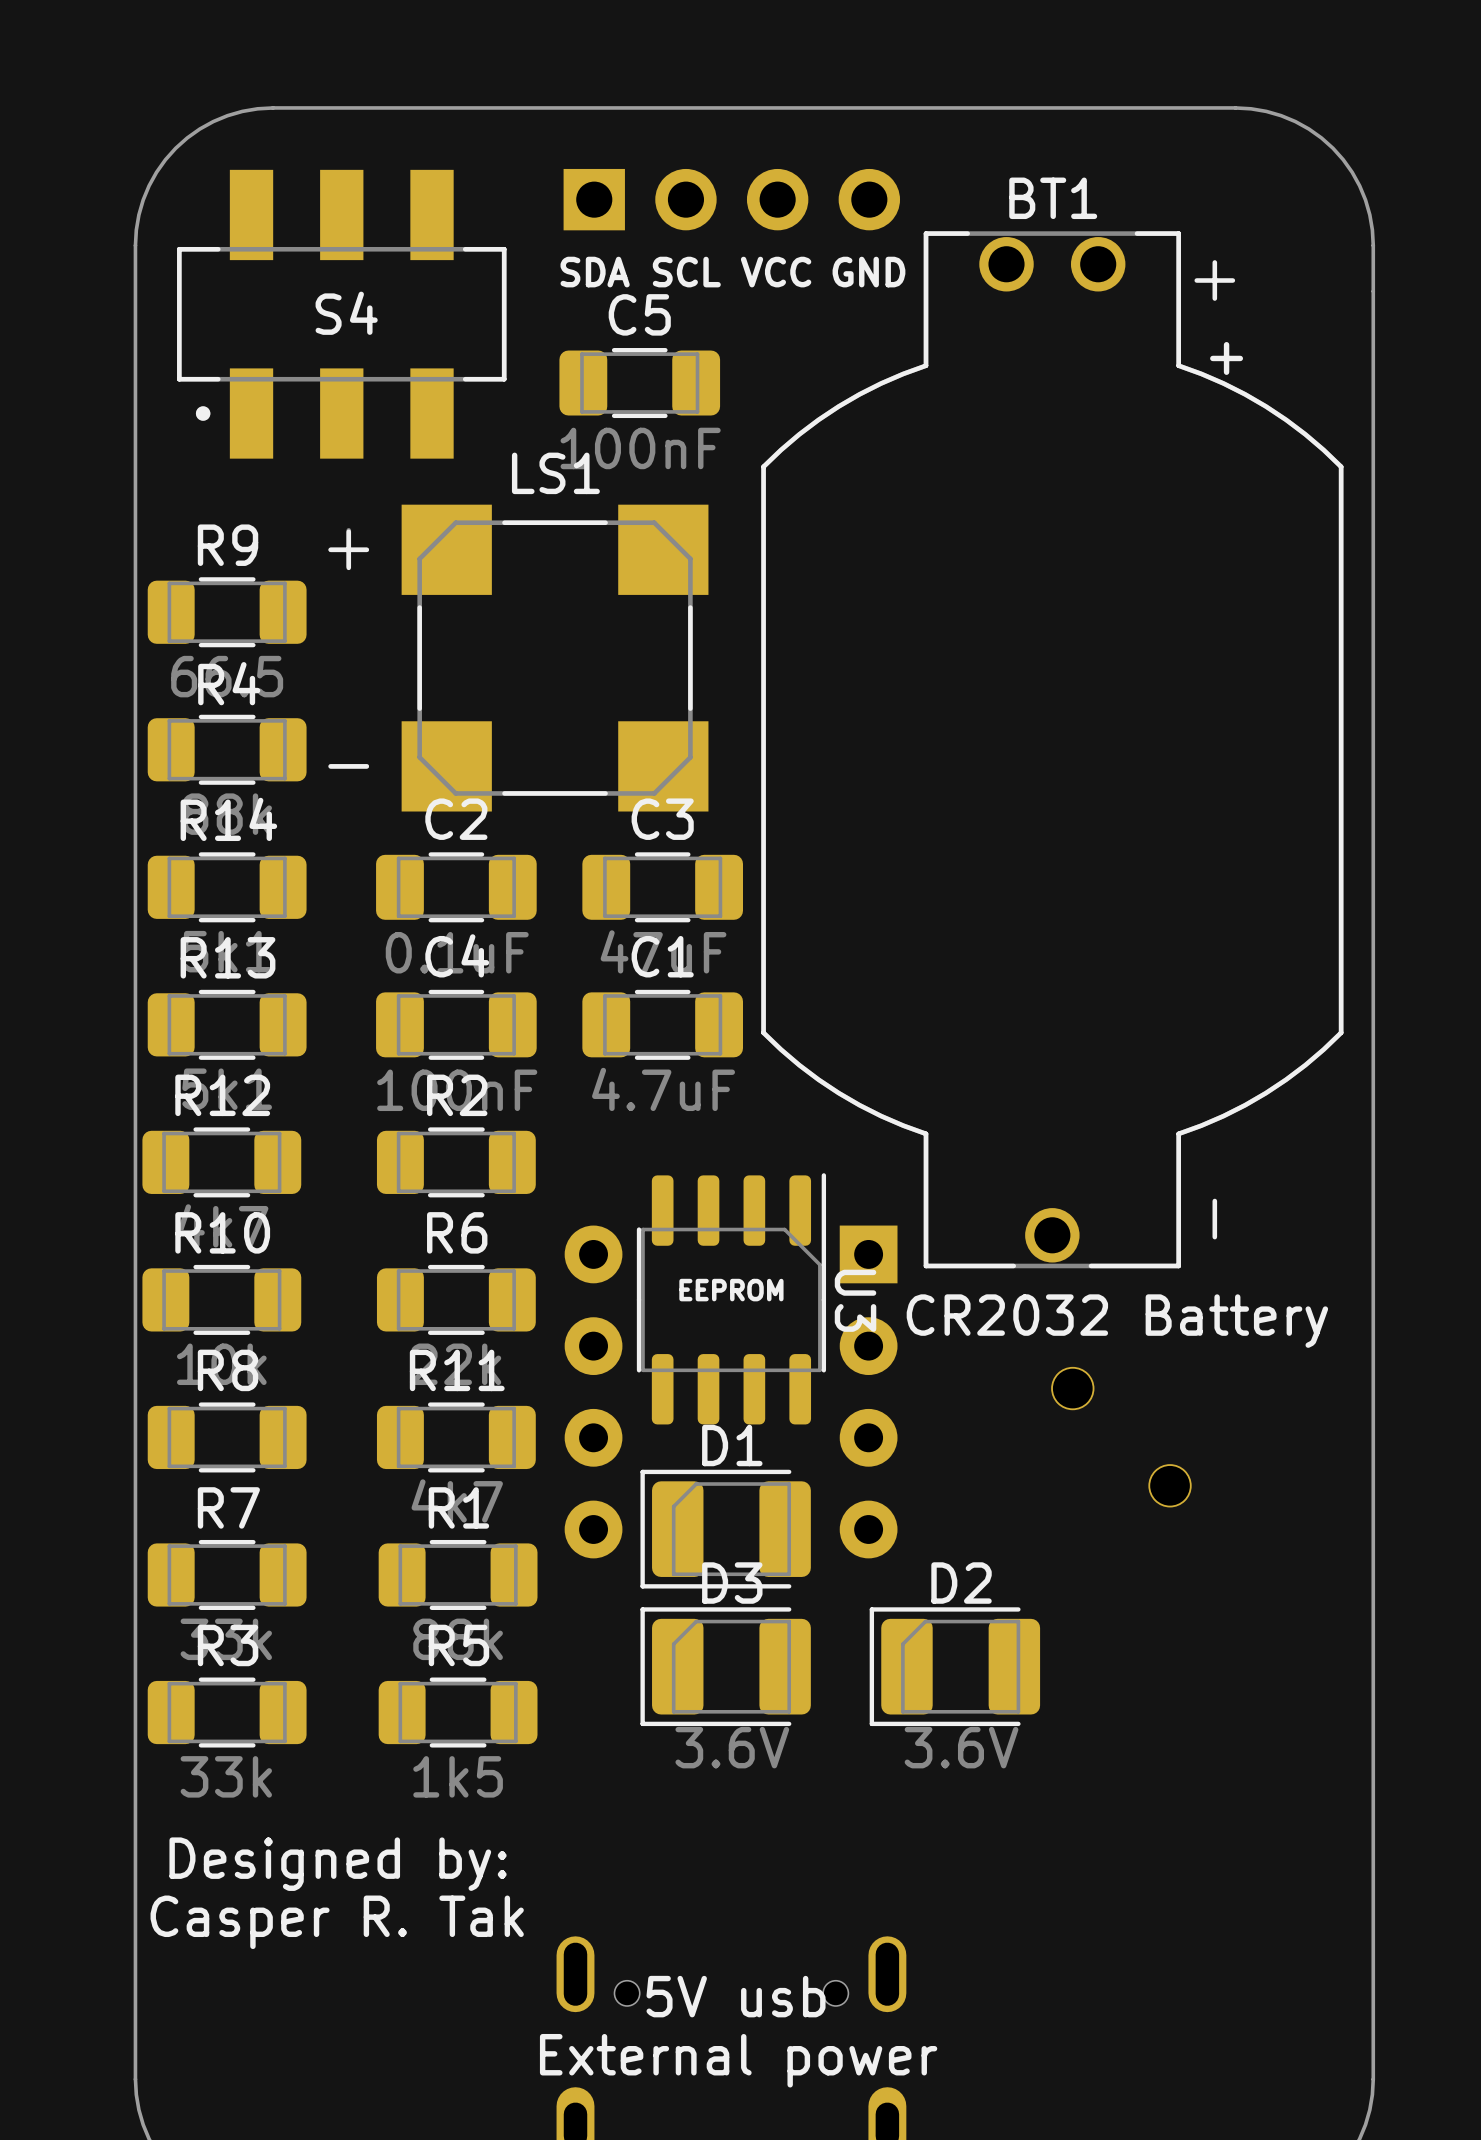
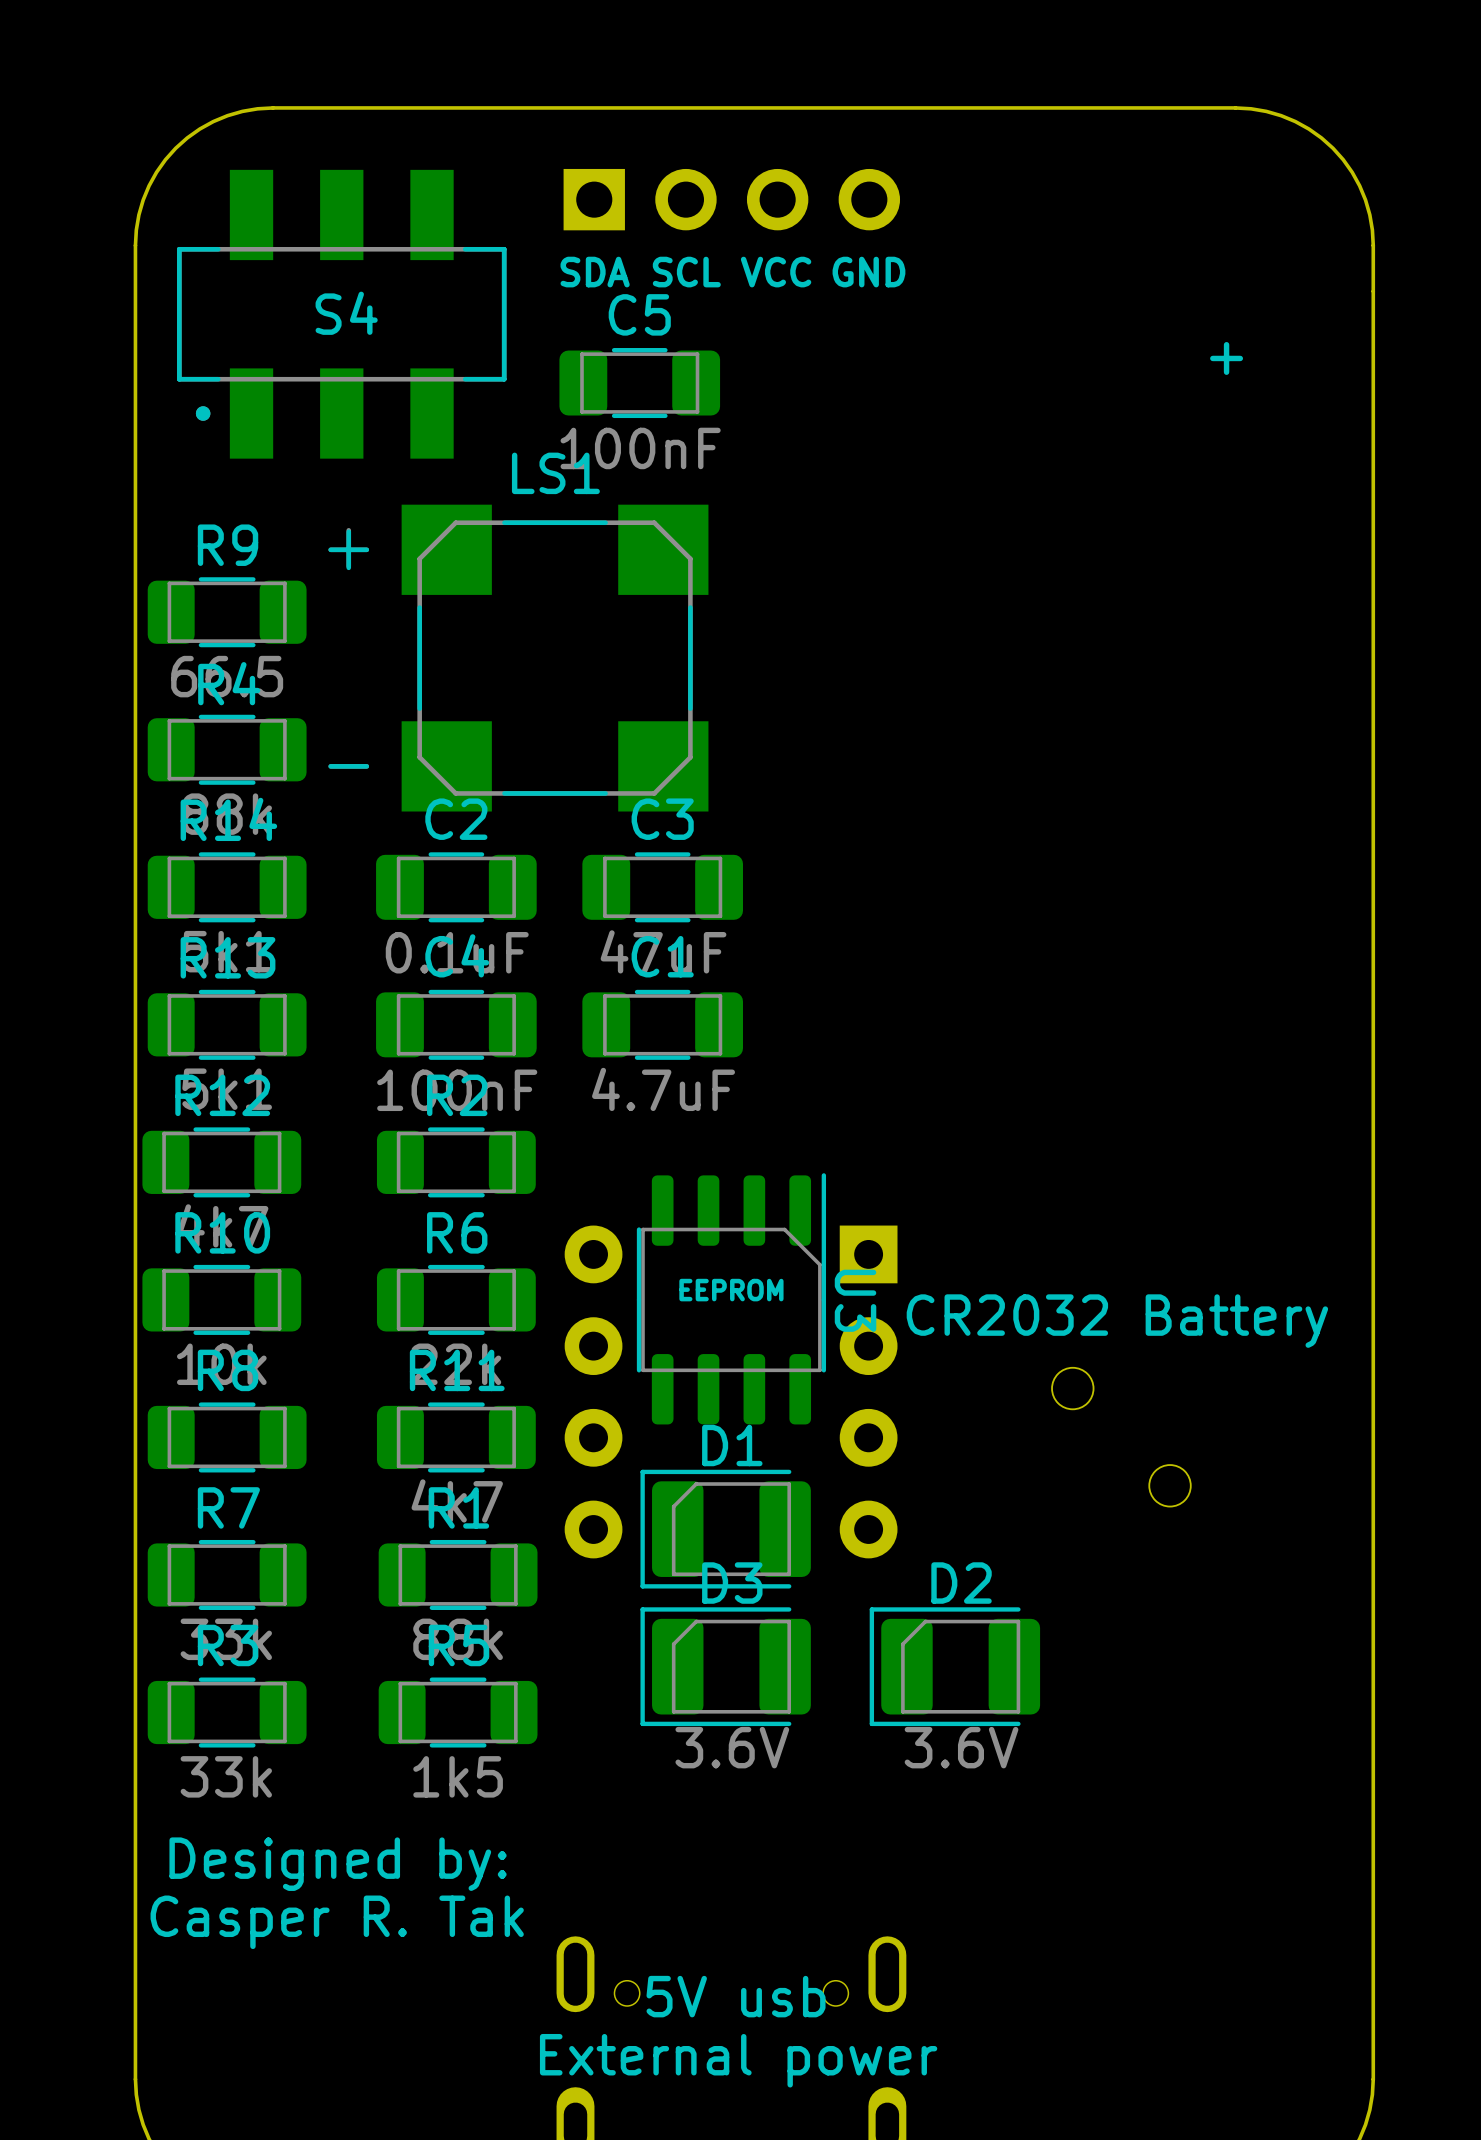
BT1: (1052, 749) -> none

